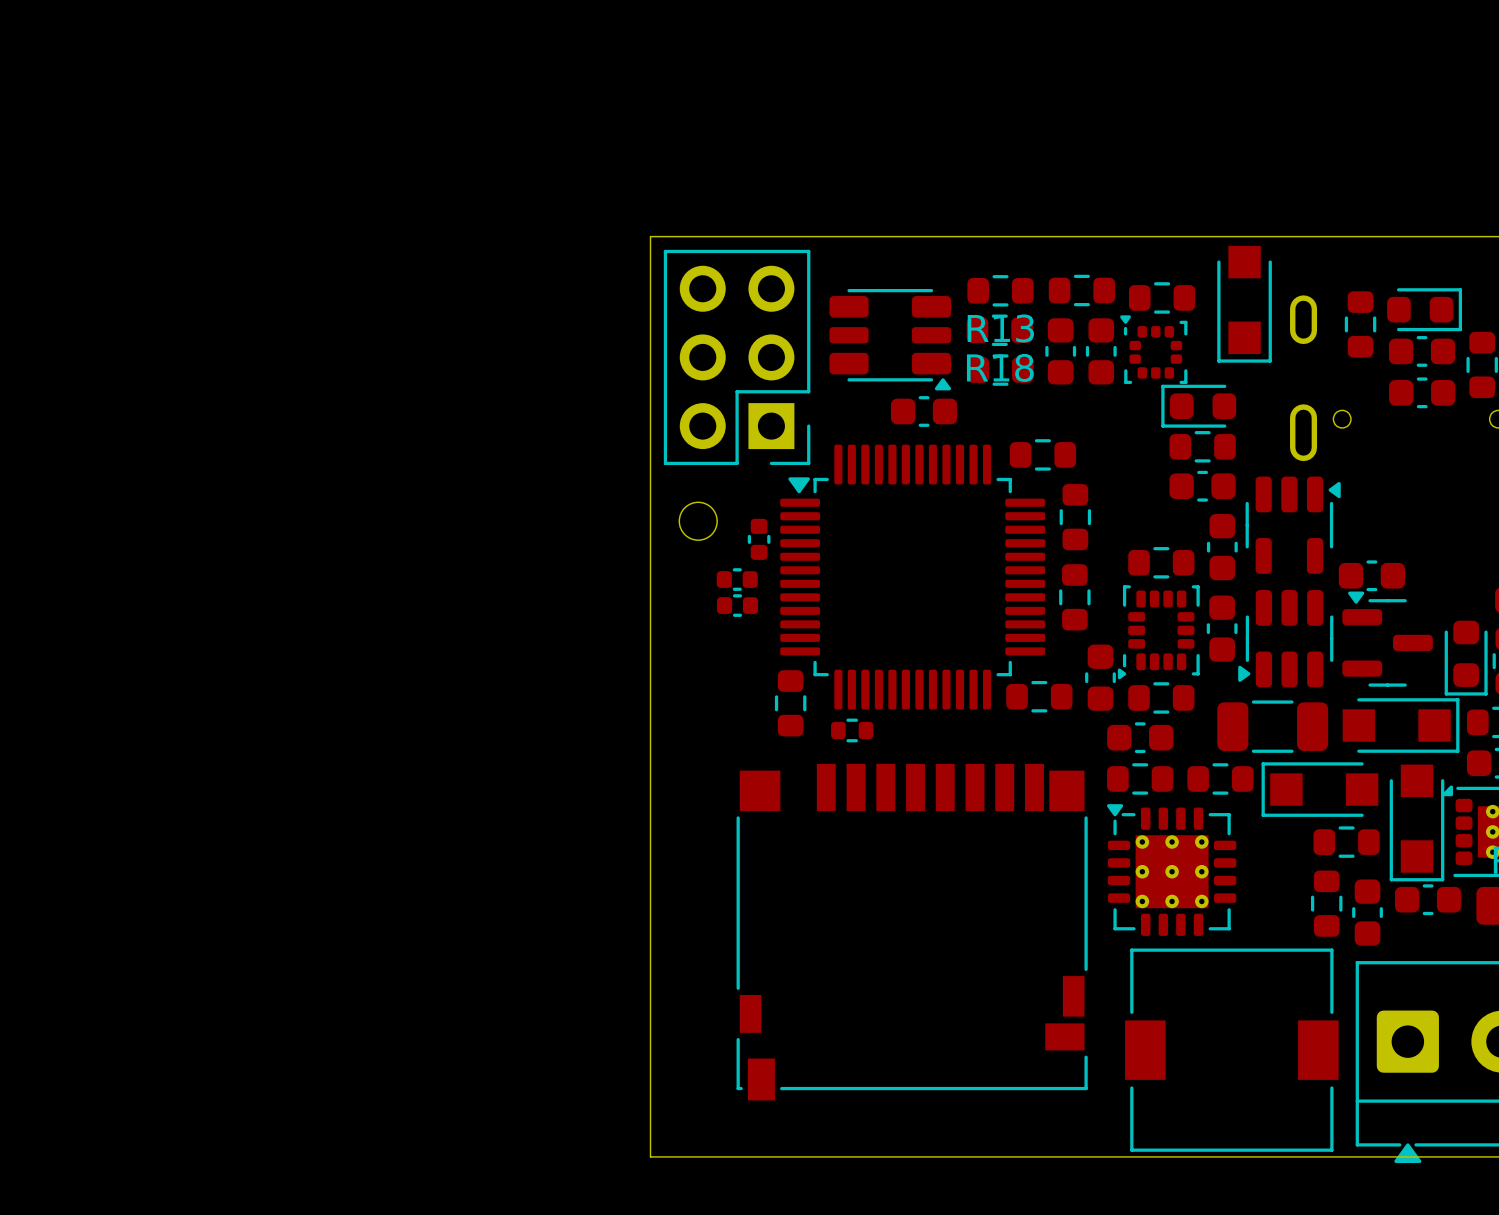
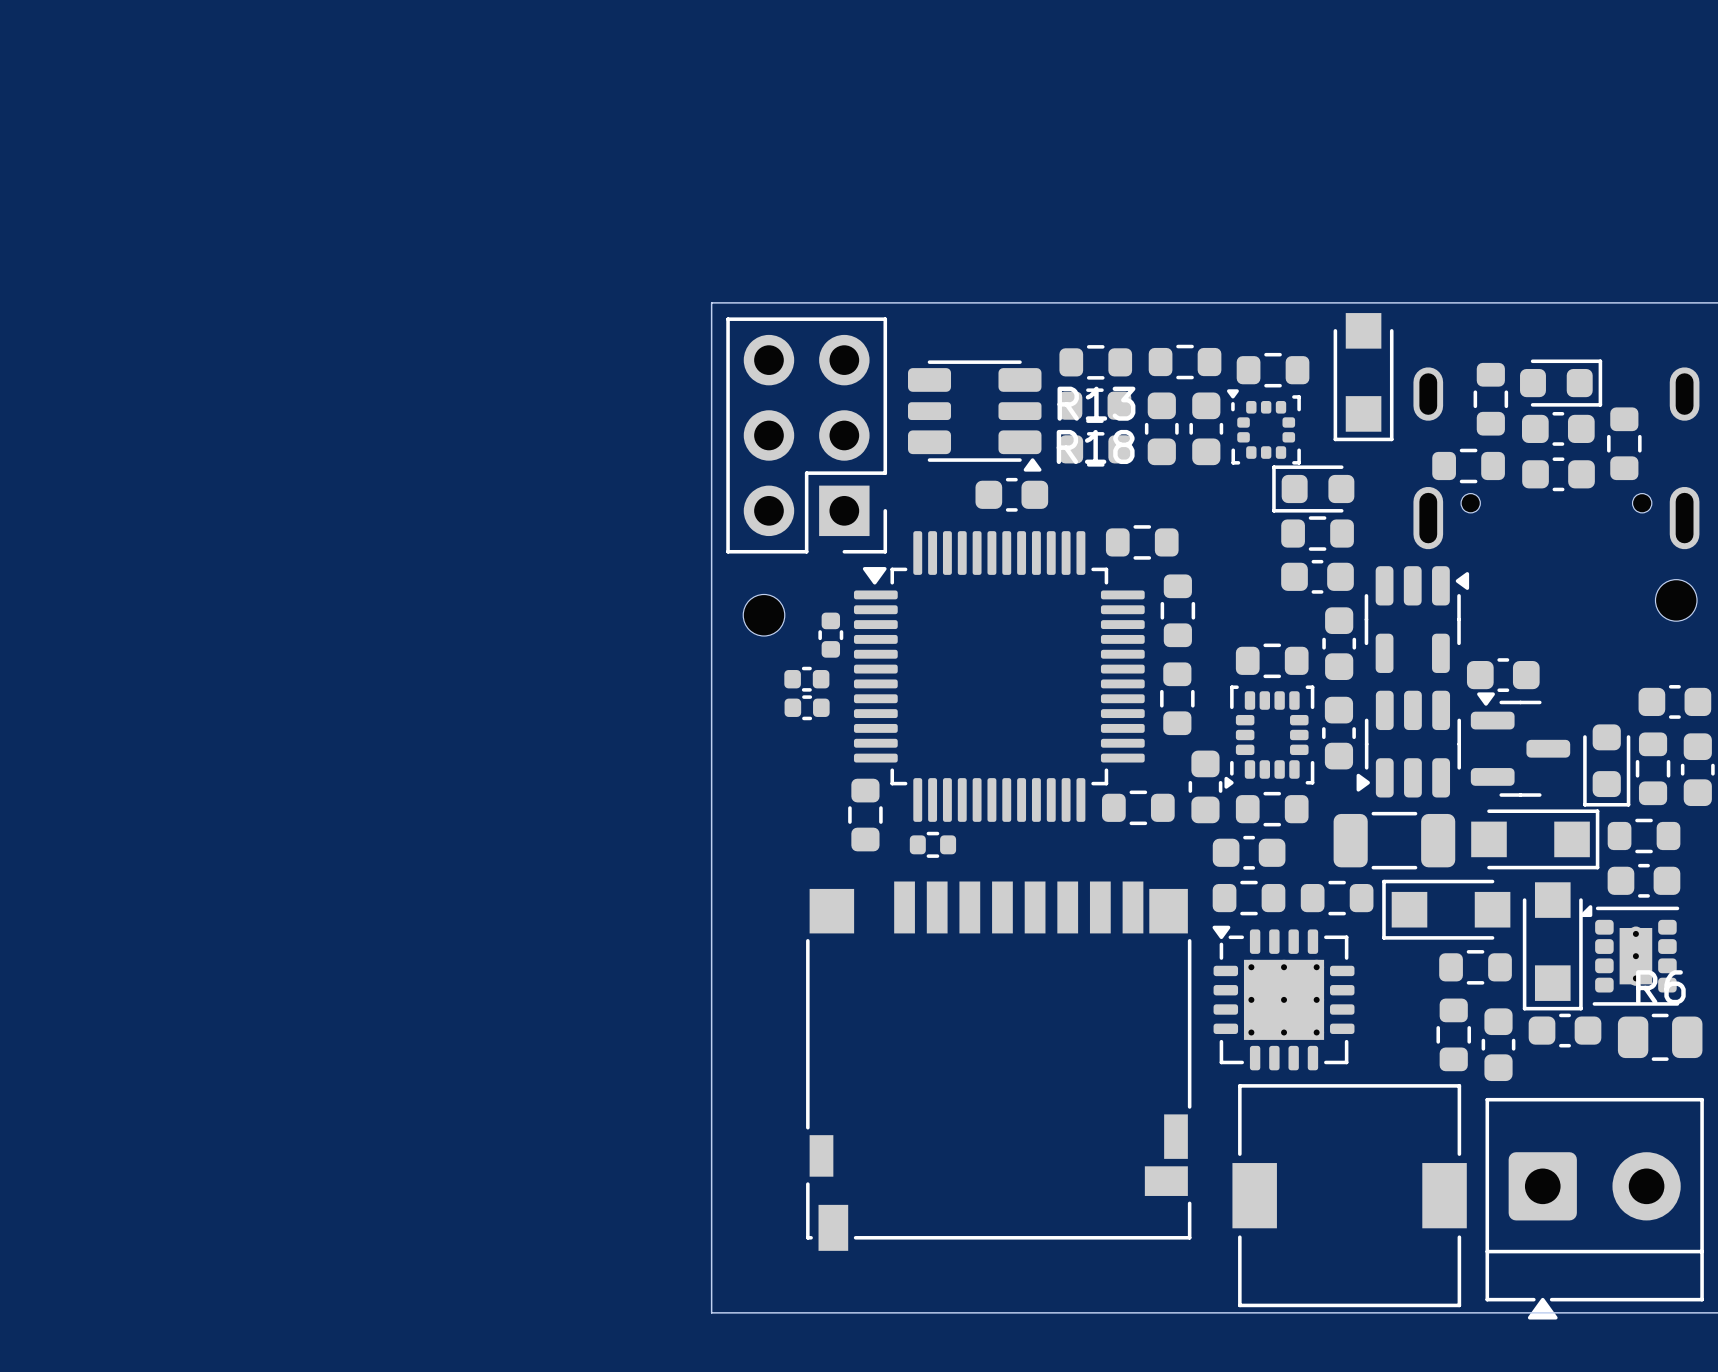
part: none -> (1468, 465)

